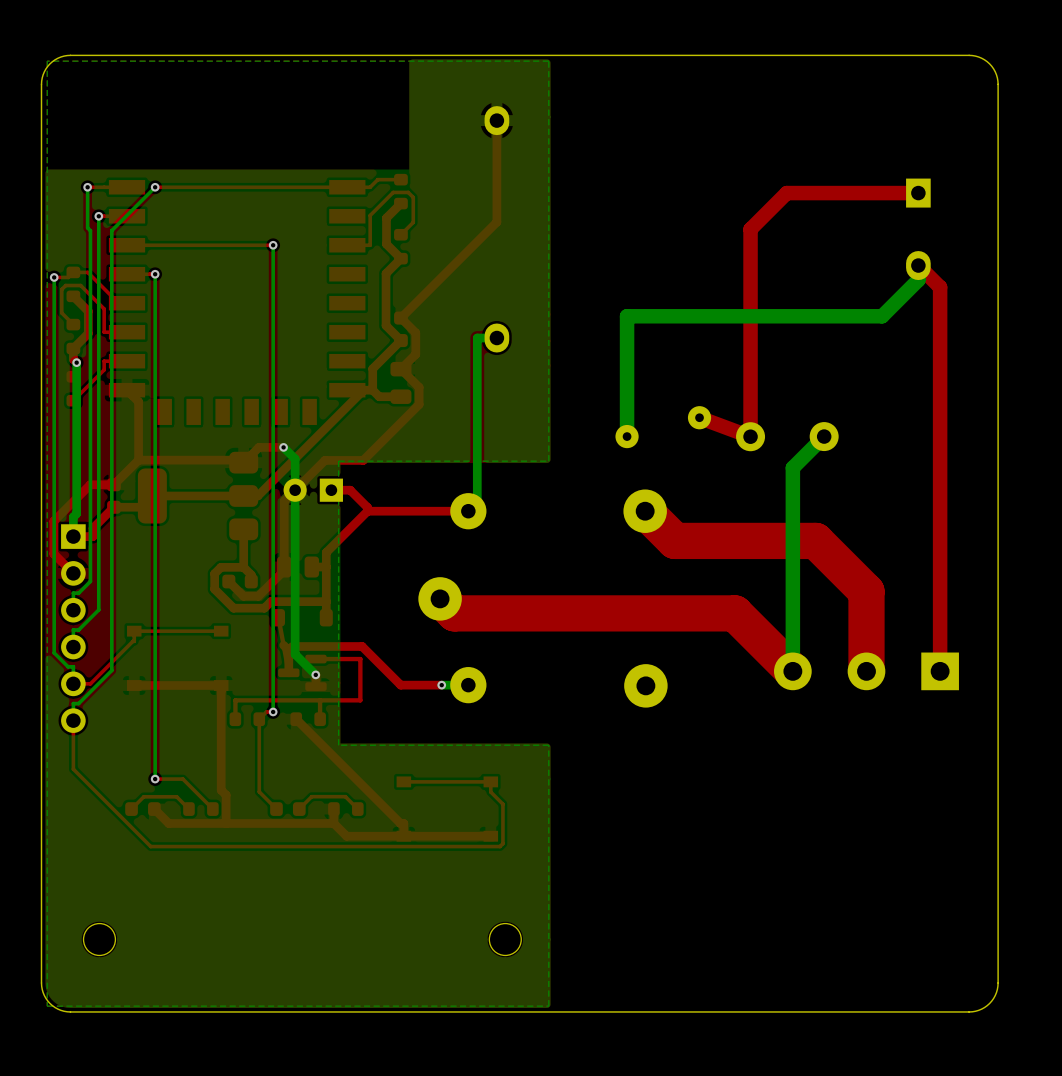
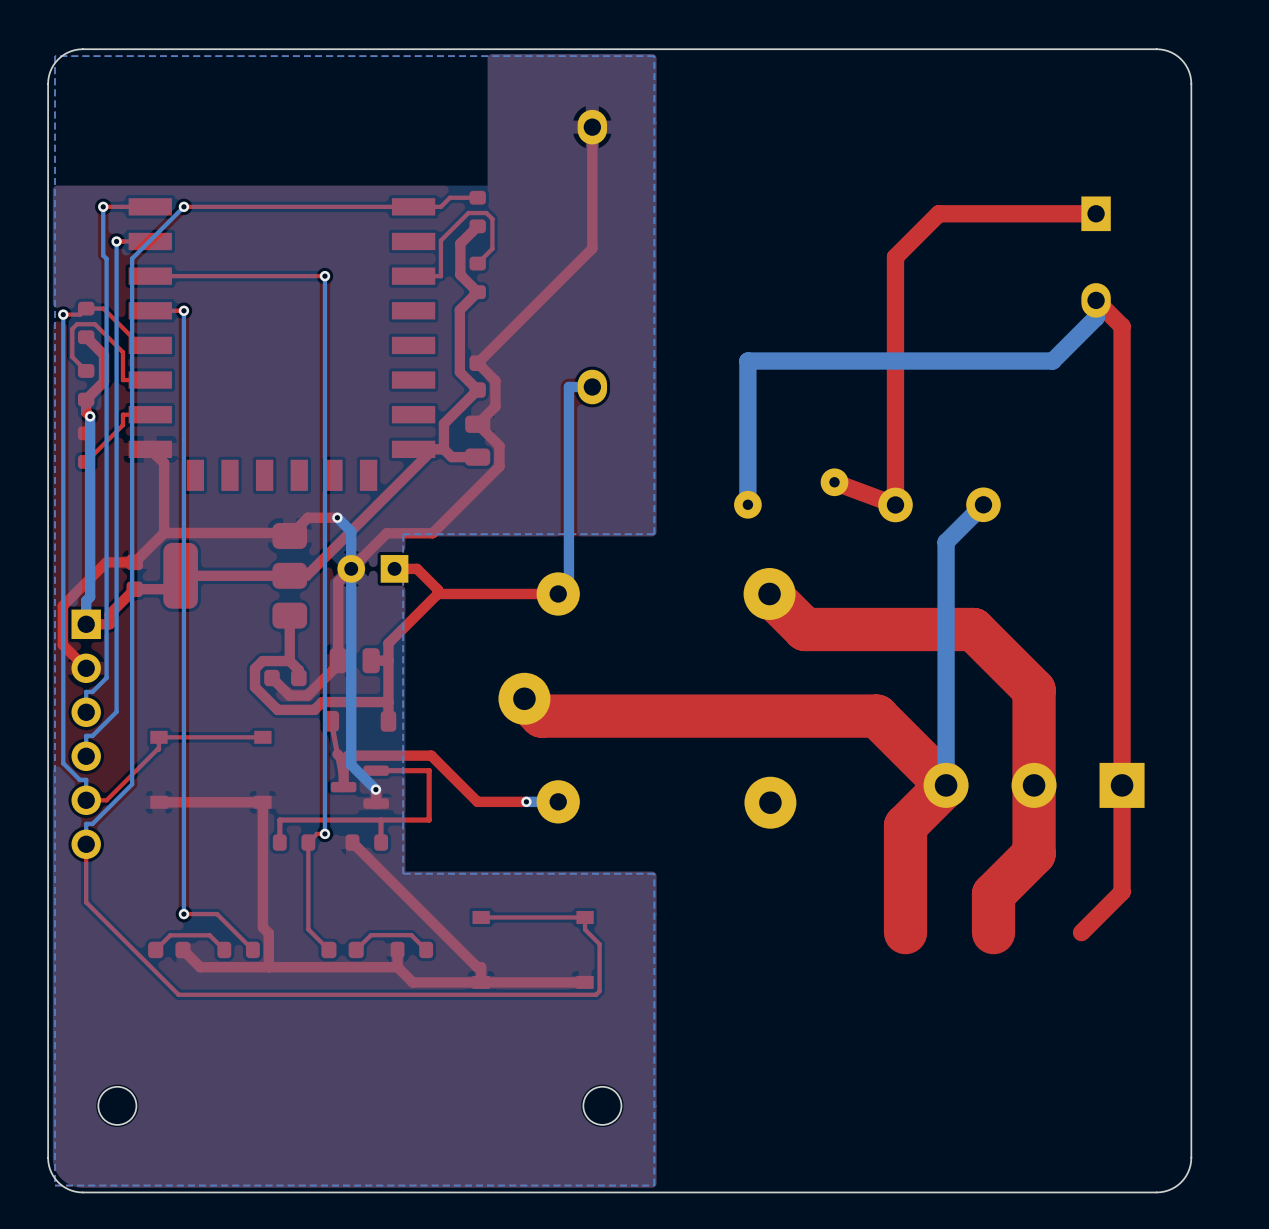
top track: none -> (946, 785) (905, 825) (905, 932)
top track: none -> (1034, 785) (1034, 853) (993, 894) (993, 932)
top track: none -> (1122, 785) (1122, 892) (1081, 932)

